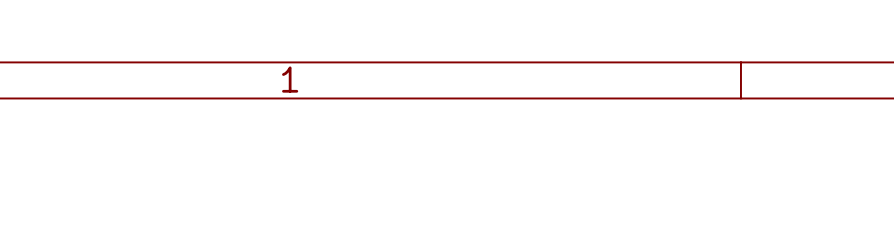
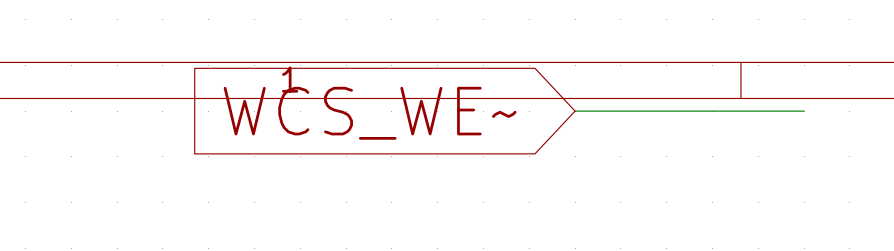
wire: none -> (575, 111) (804, 111)
global label: none -> WCS_WE~ (370, 113)

